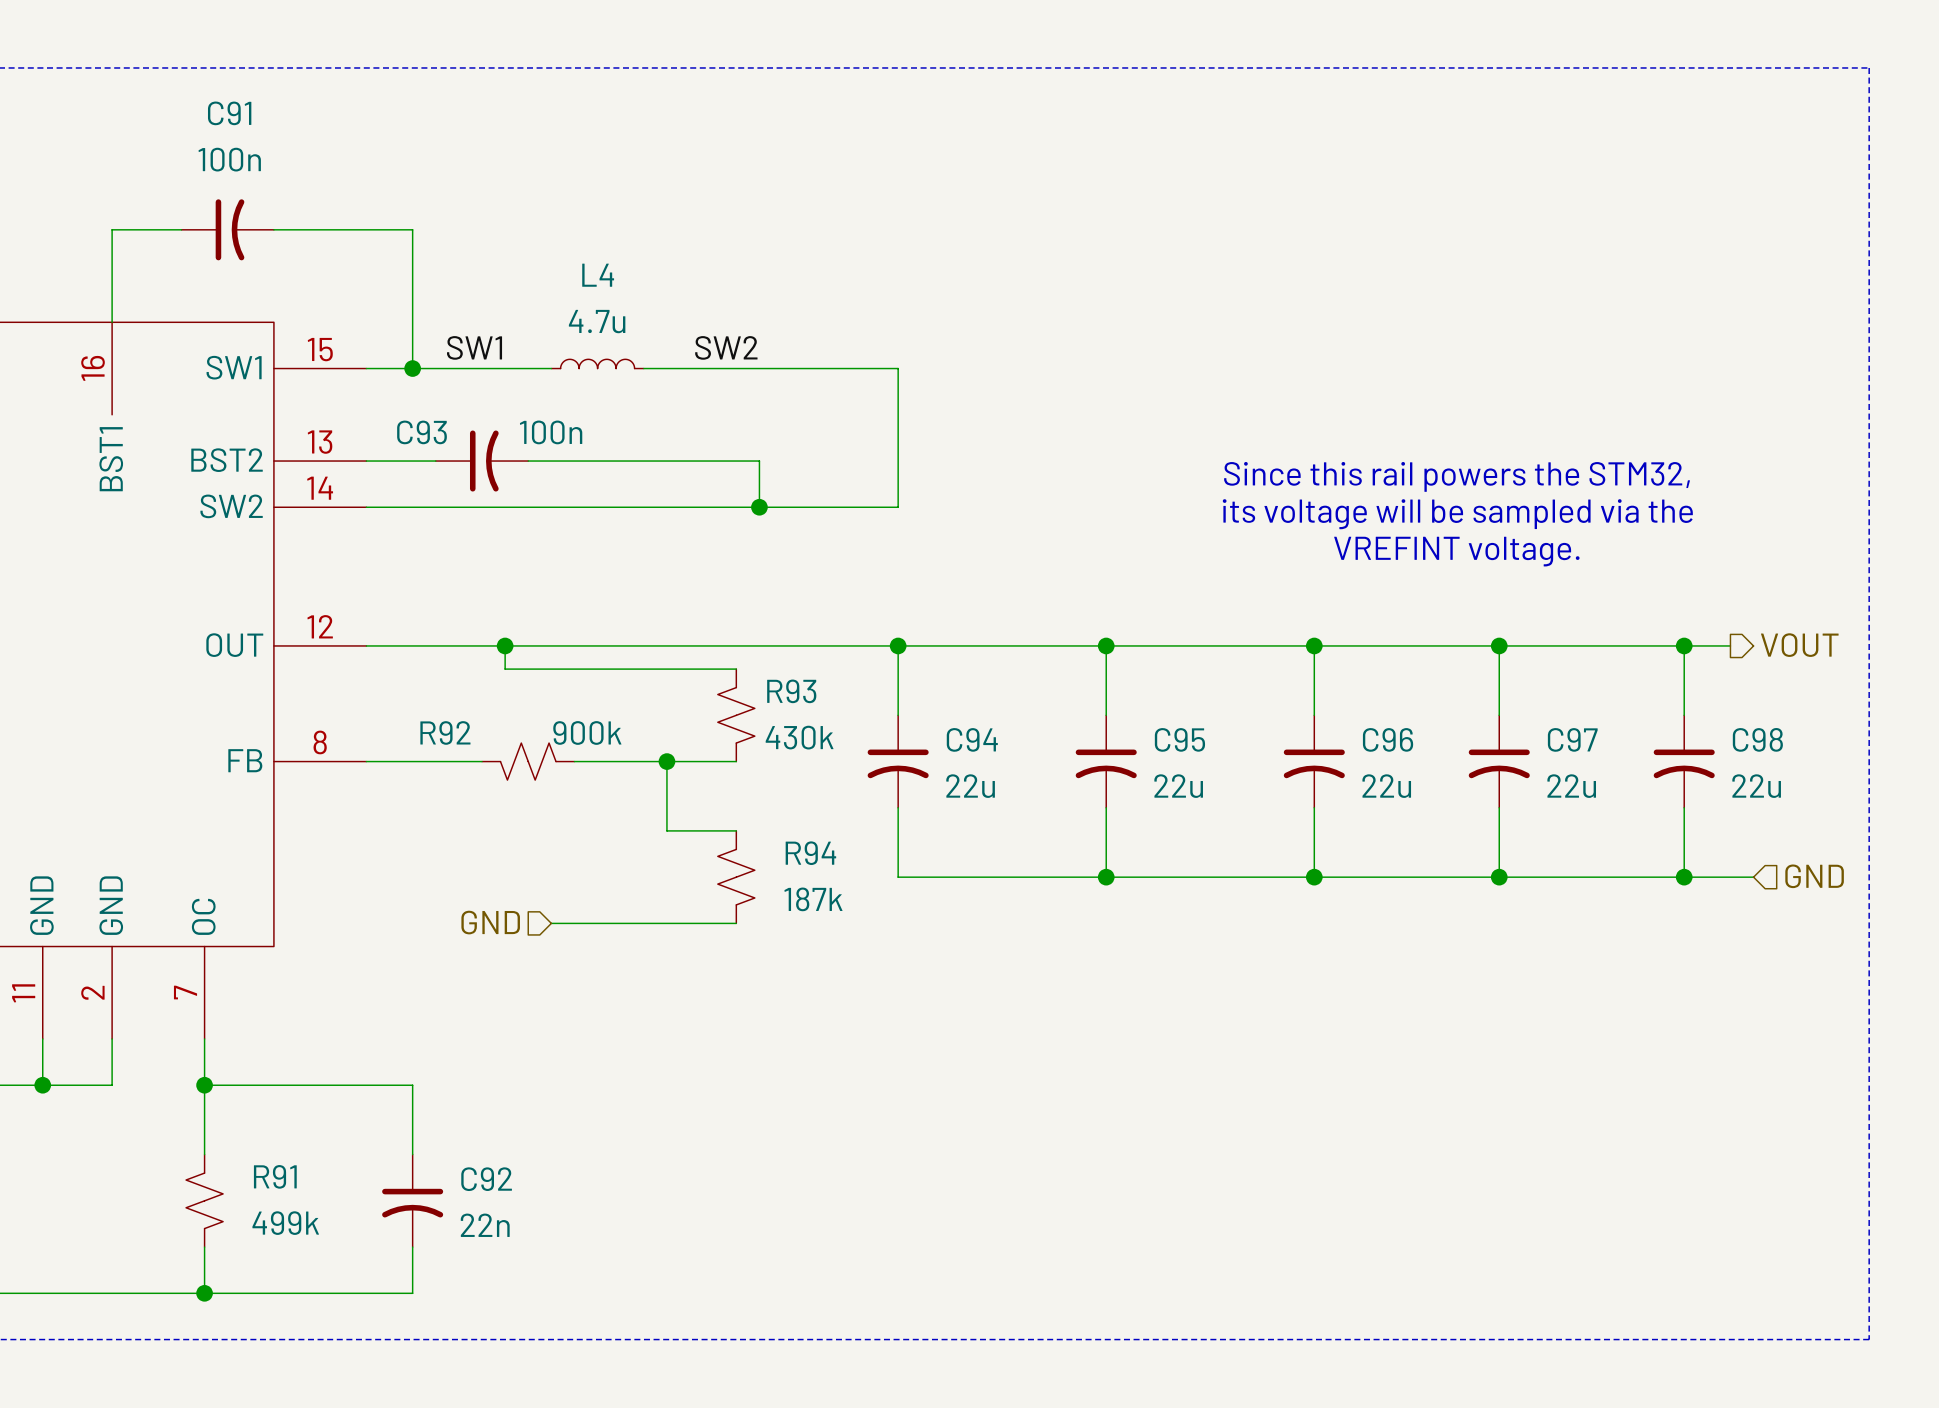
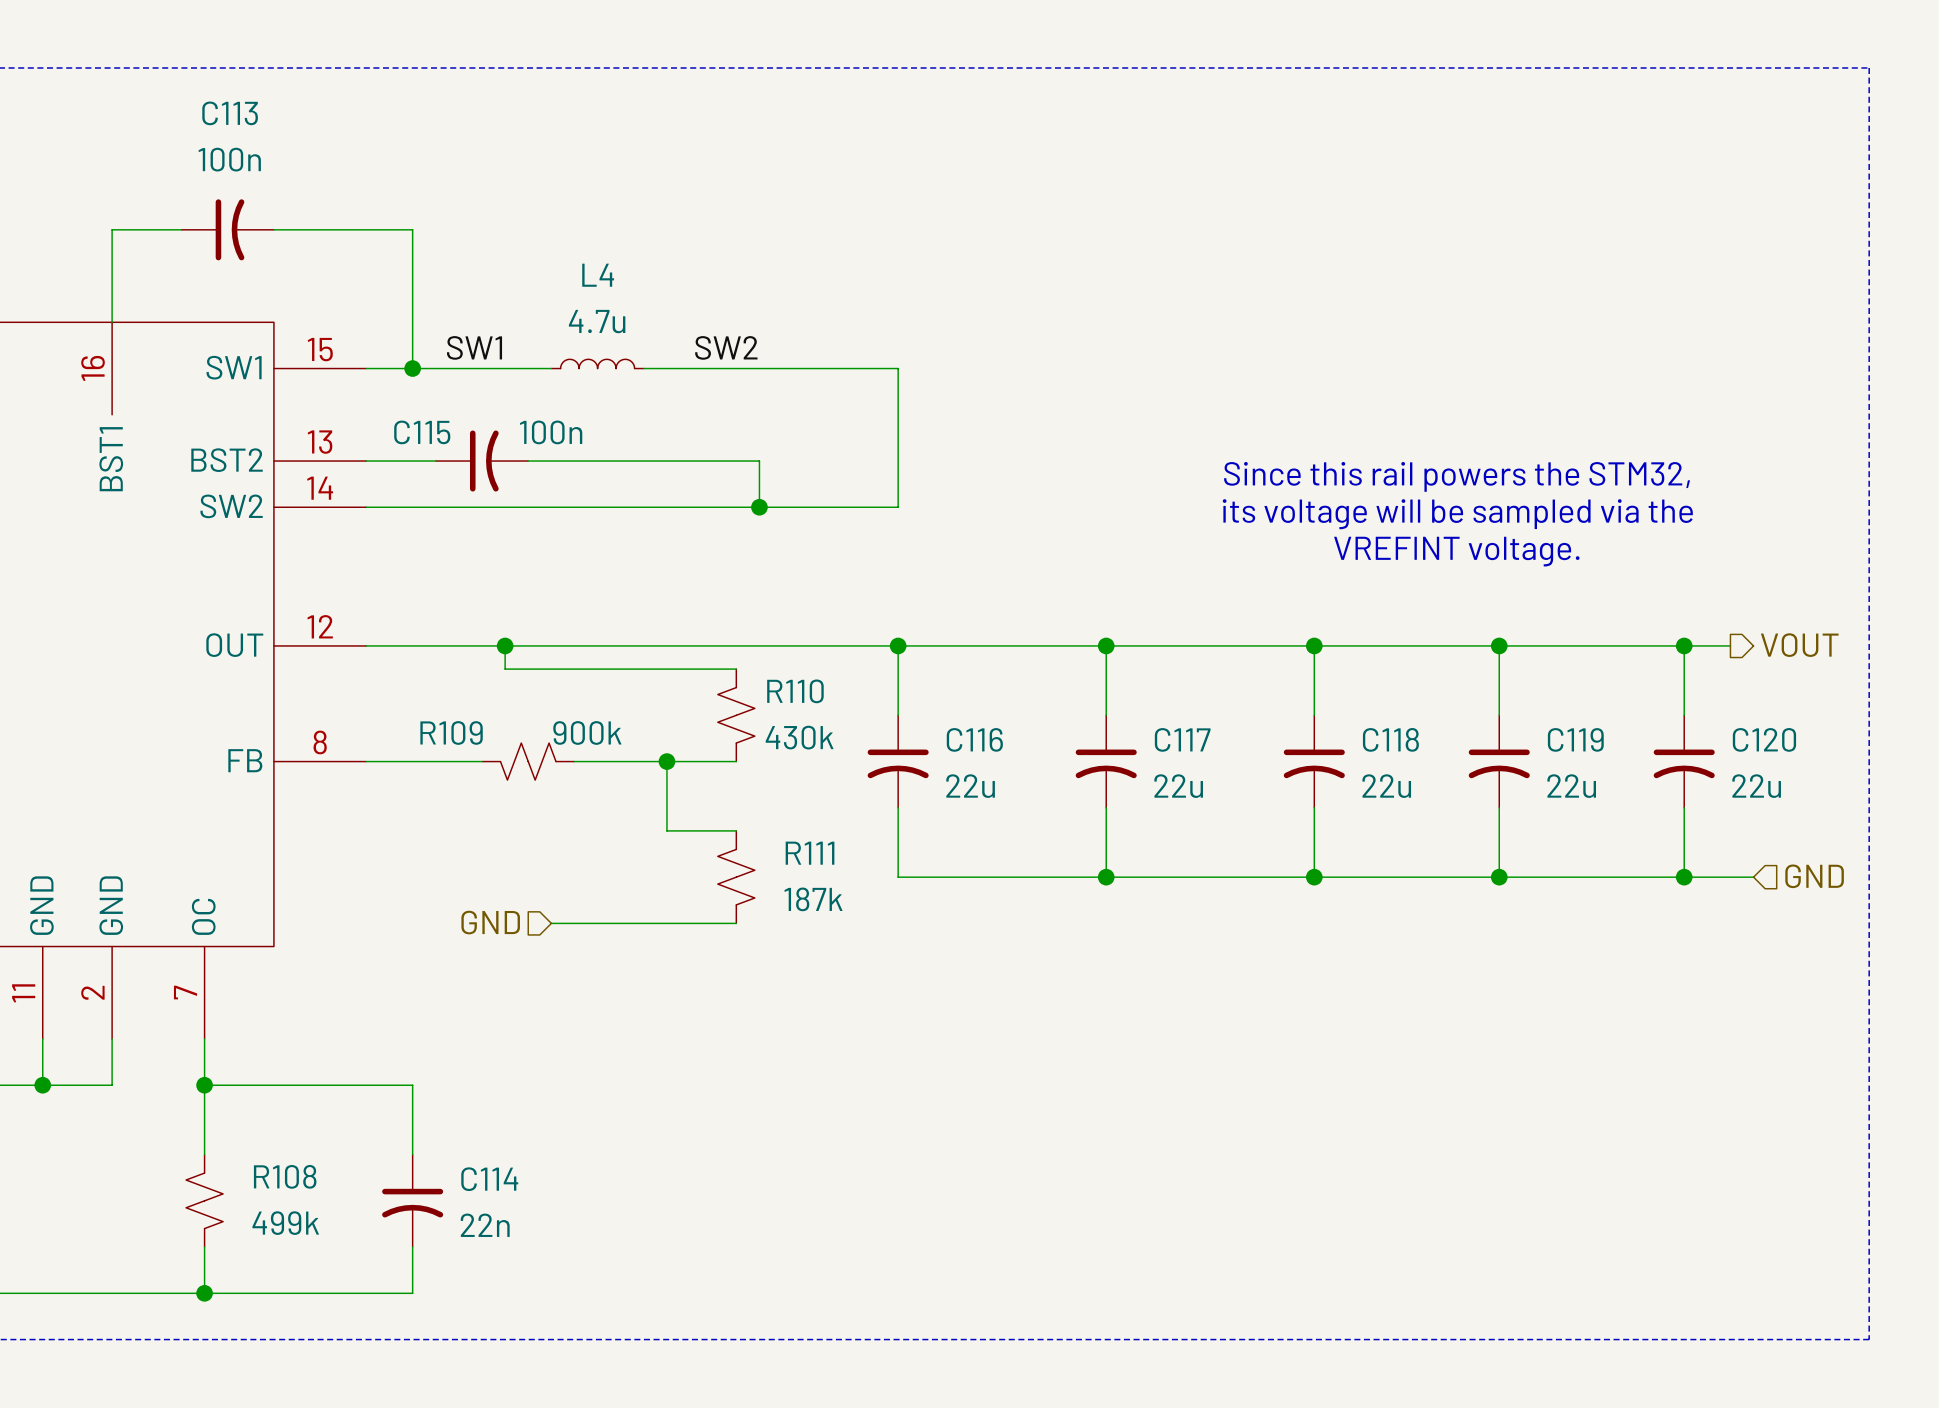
C91 name: C91 (229, 113) -> C113 (230, 113)
C93 name: C93 (422, 432) -> C115 (422, 432)
R93 name: R93 (791, 691) -> R110 (795, 691)
R92 name: R92 (445, 732) -> R109 (451, 732)
C94 name: C94 (972, 739) -> C116 (974, 739)
C95 name: C95 (1179, 739) -> C117 (1182, 739)
C96 name: C96 (1388, 739) -> C118 (1390, 739)
C97 name: C97 (1572, 739) -> C119 (1575, 739)
C98 name: C98 (1757, 739) -> C120 (1764, 739)
R94 name: R94 (810, 853) -> R111 (810, 853)
R91 name: R91 (275, 1176) -> R108 (285, 1176)
C92 name: C92 (486, 1179) -> C114 (489, 1179)

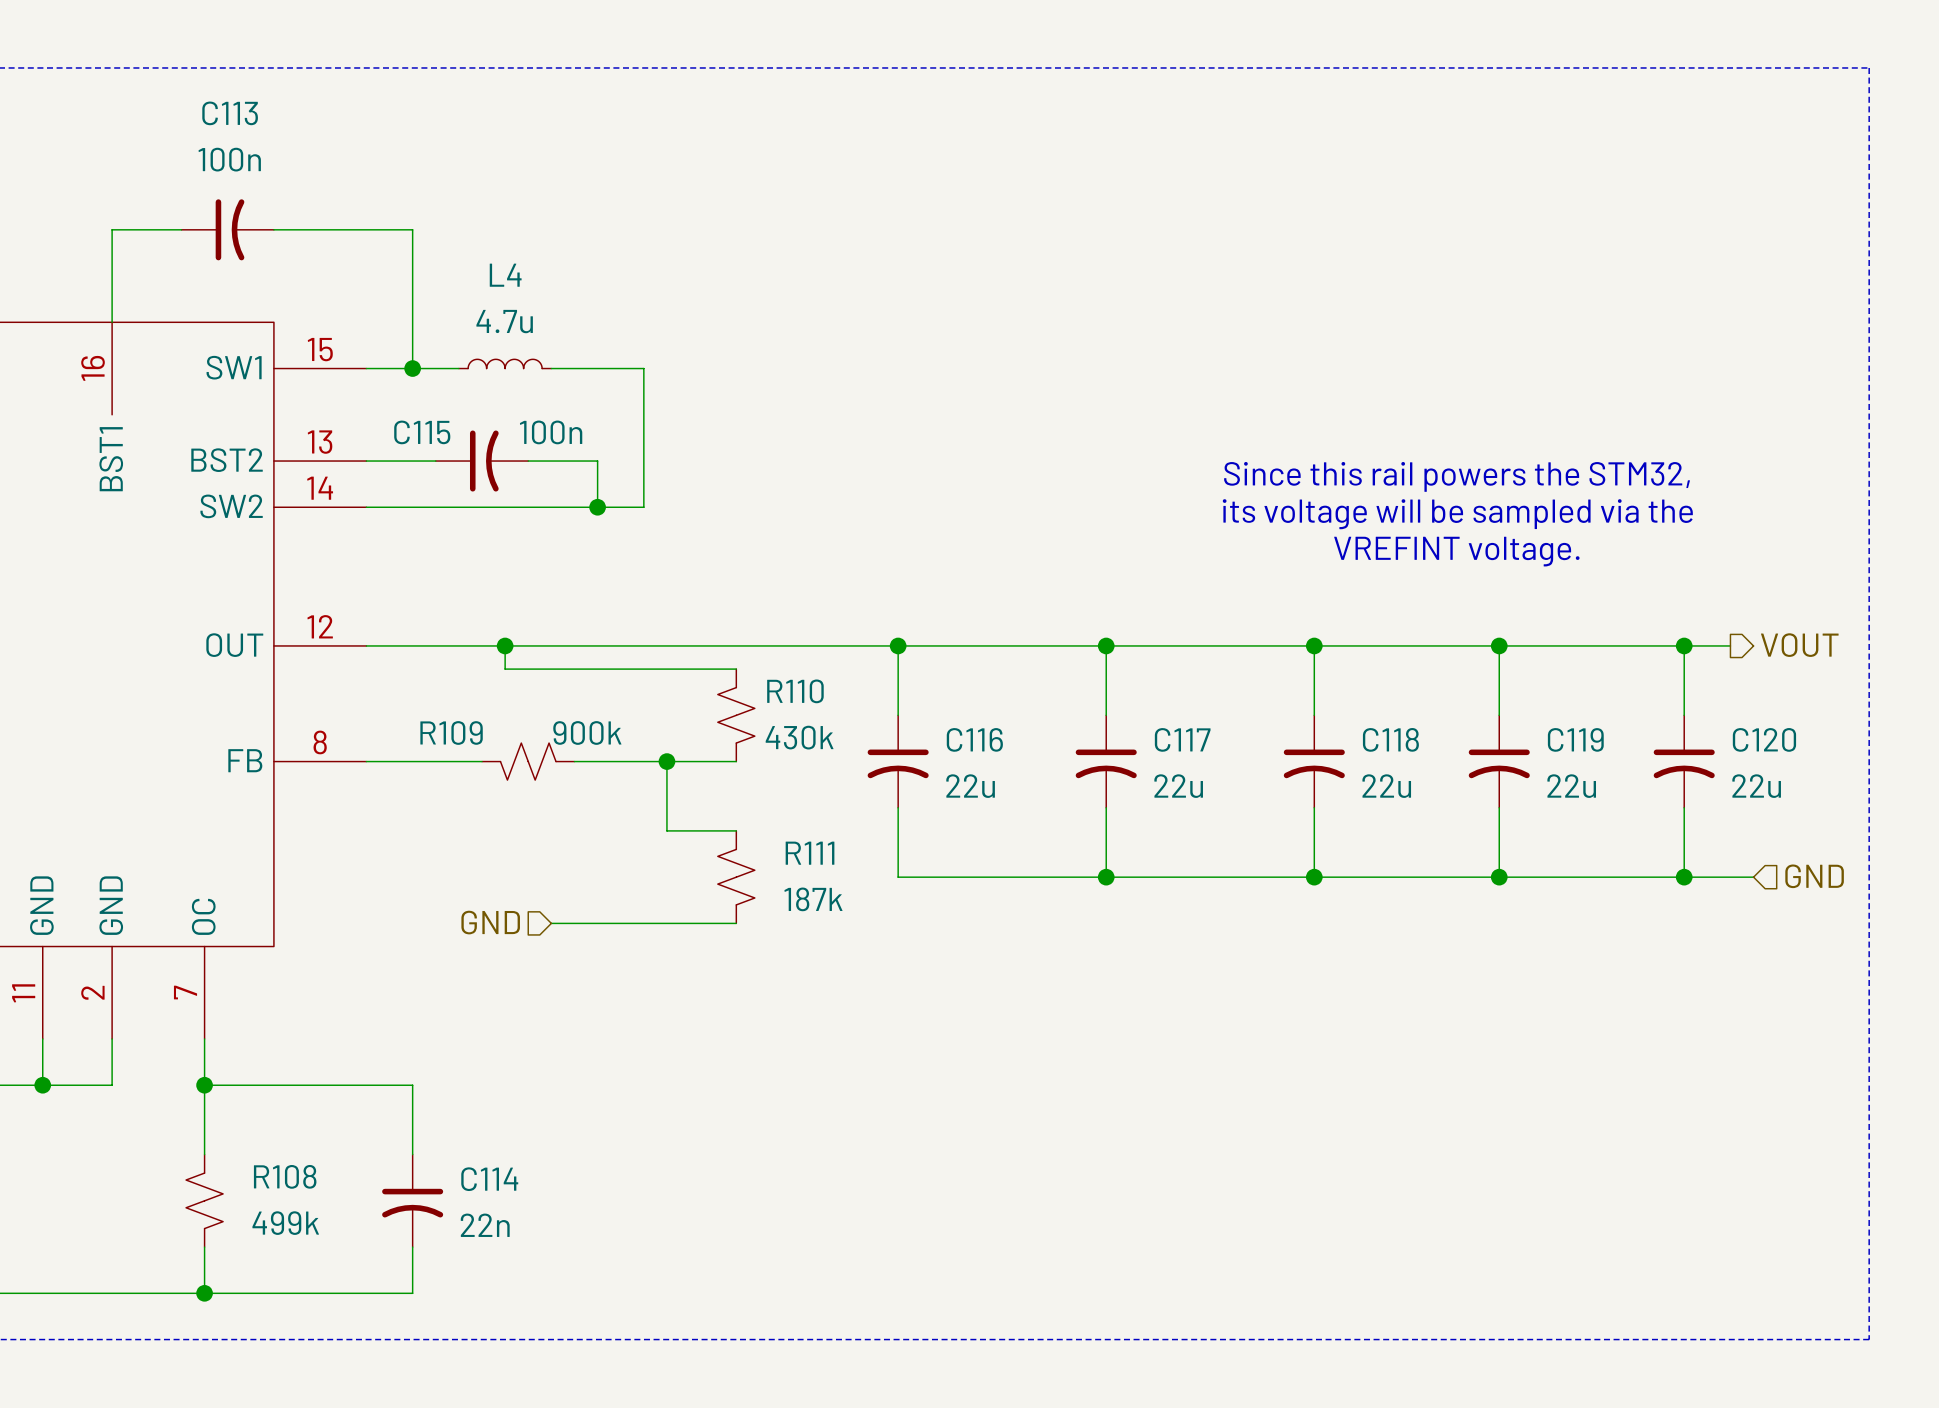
label: SW1 (474, 347) -> none
label: SW2 (726, 347) -> none
L4 position: (597, 363) -> (505, 363)
wire: (458, 368) (551, 368) -> none
wire: (643, 368) (898, 368) (898, 507) (643, 507) -> (551, 368) (643, 368) (643, 507)
wire: (597, 461) (759, 461) (759, 507) -> (597, 461) (597, 507)
junction: none -> (597, 507)
junction: (759, 507) -> none

